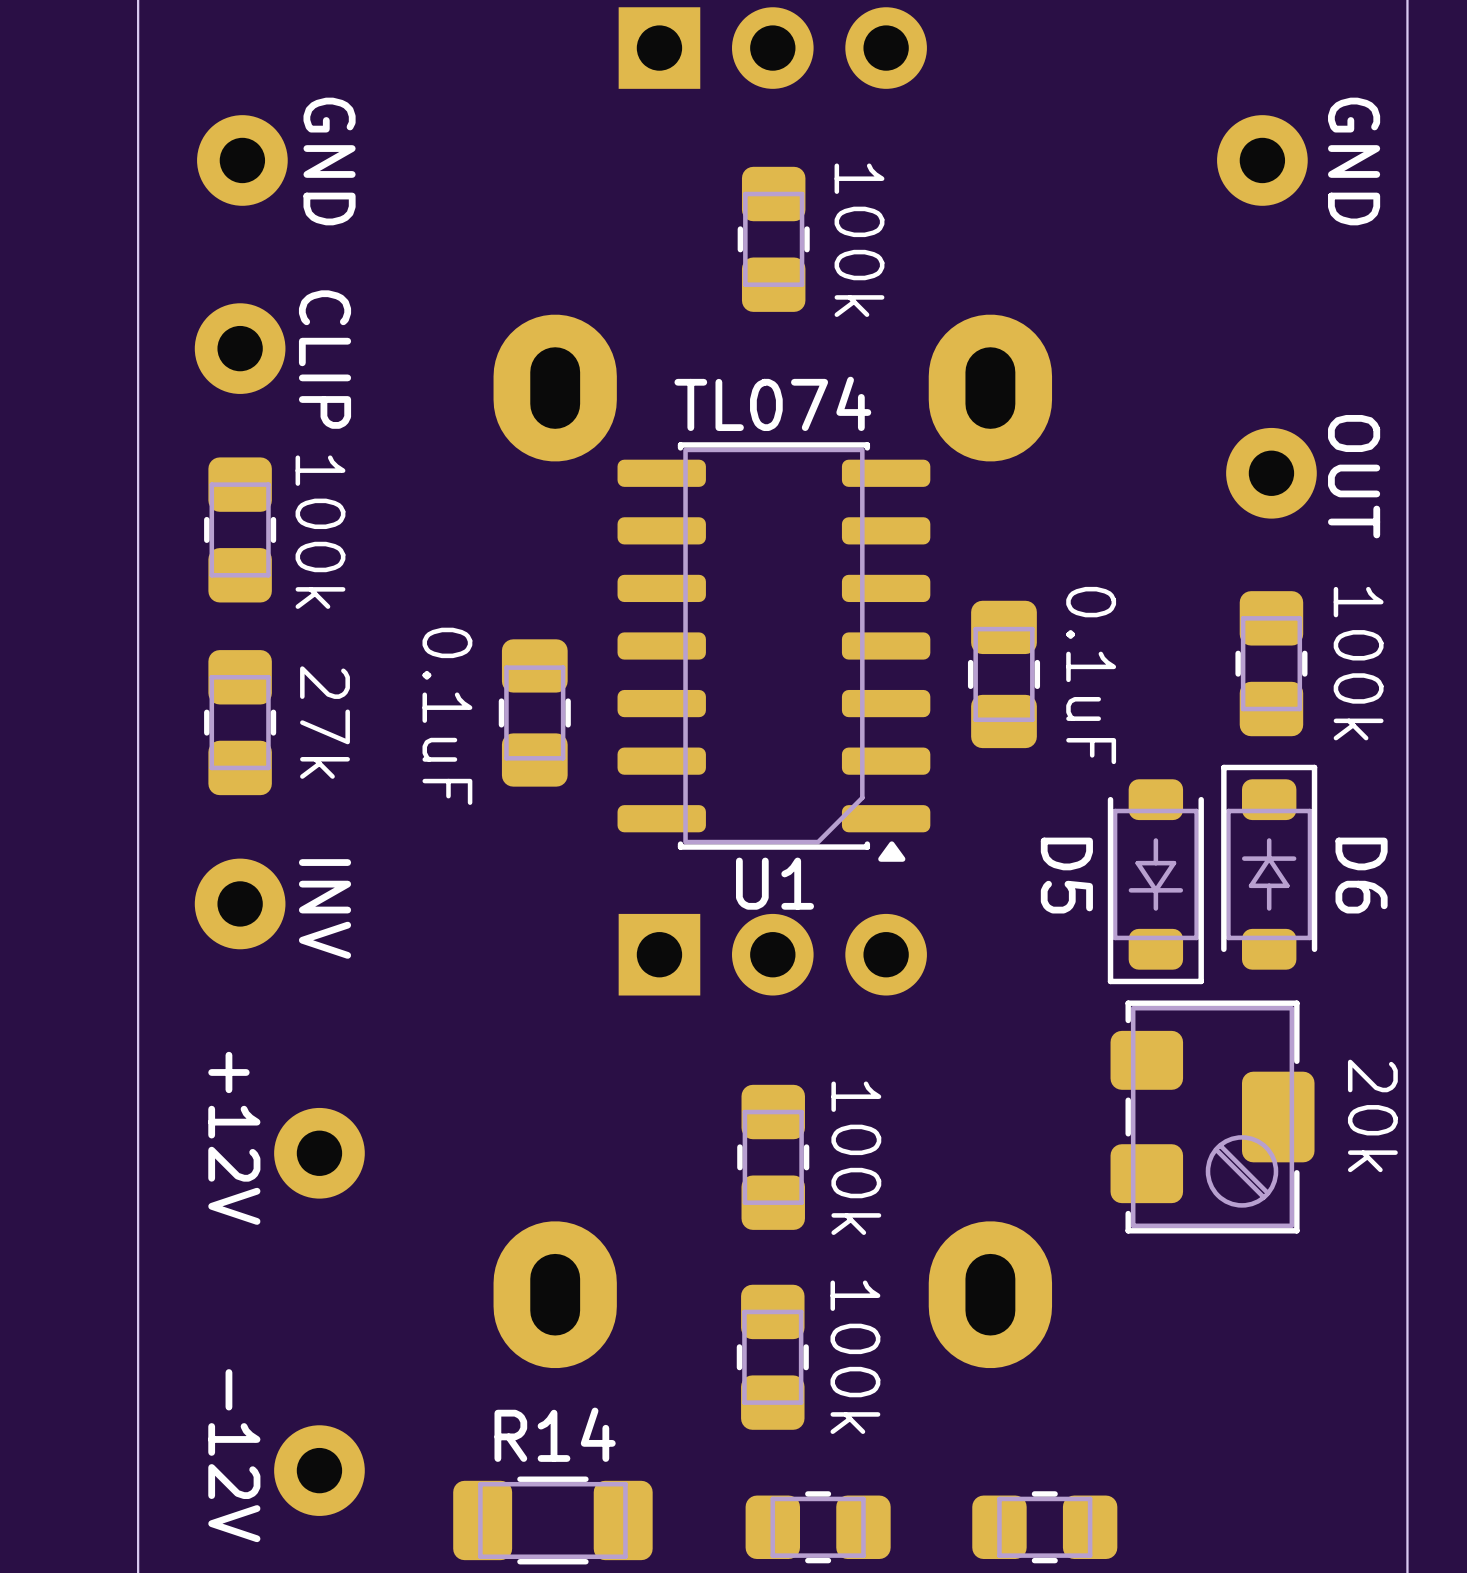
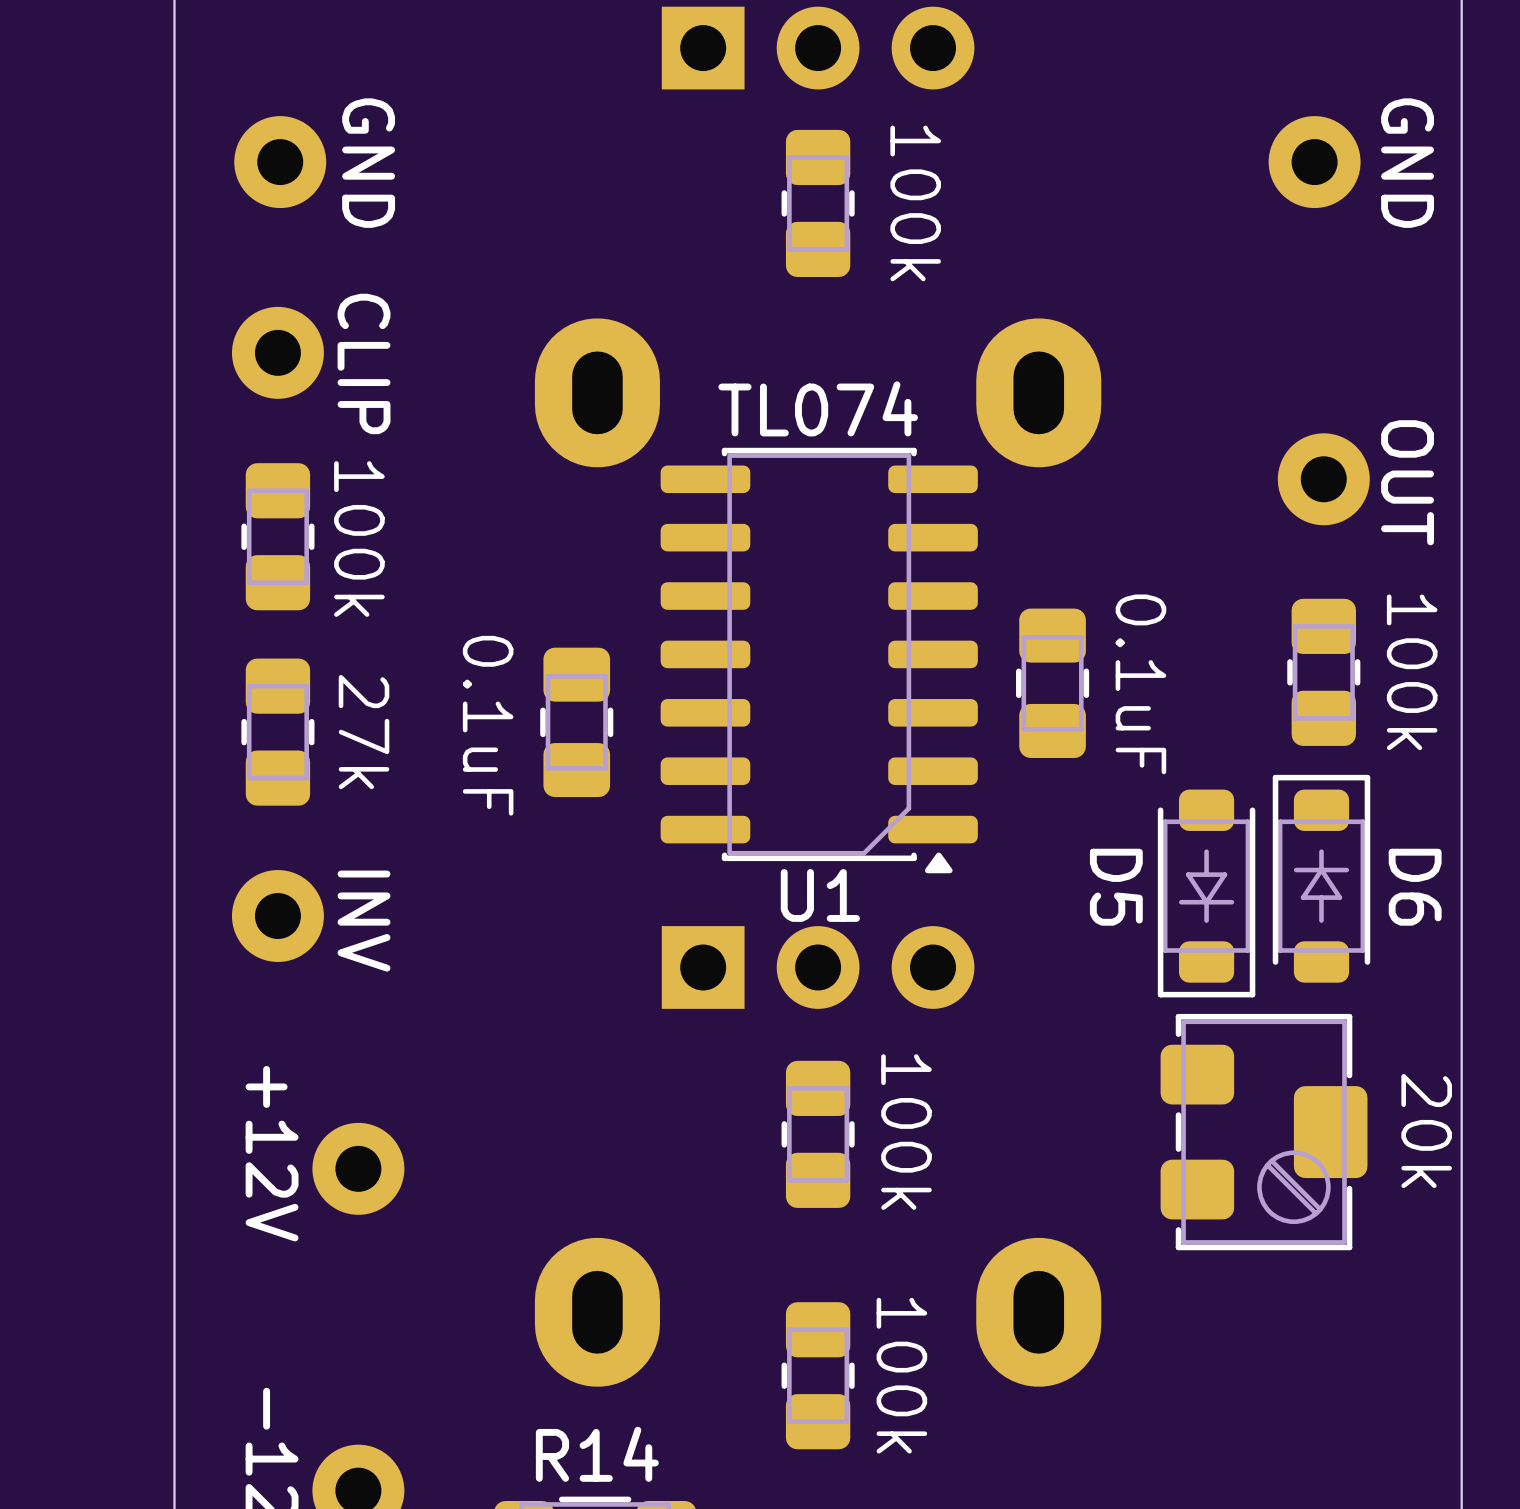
part position: (773, 239) -> (818, 203)
text position: 100k (859, 240) -> 100k (915, 203)
part position: (773, 1157) -> (818, 1134)
text position: 100k (856, 1158) -> 100k (906, 1132)

